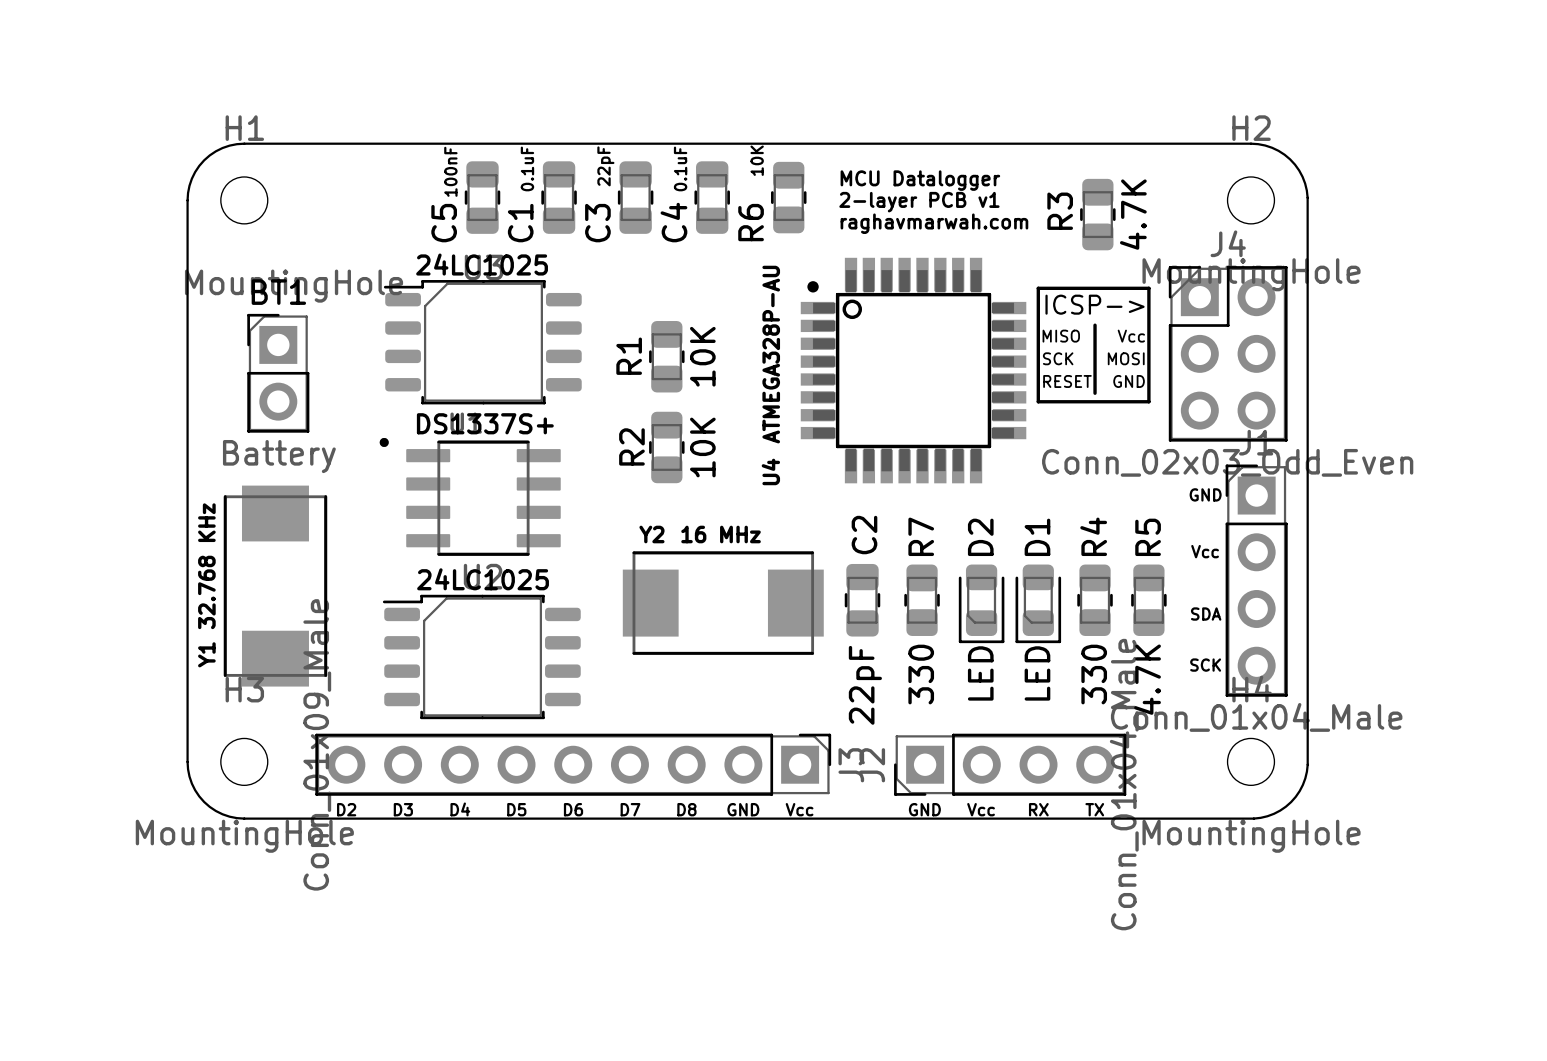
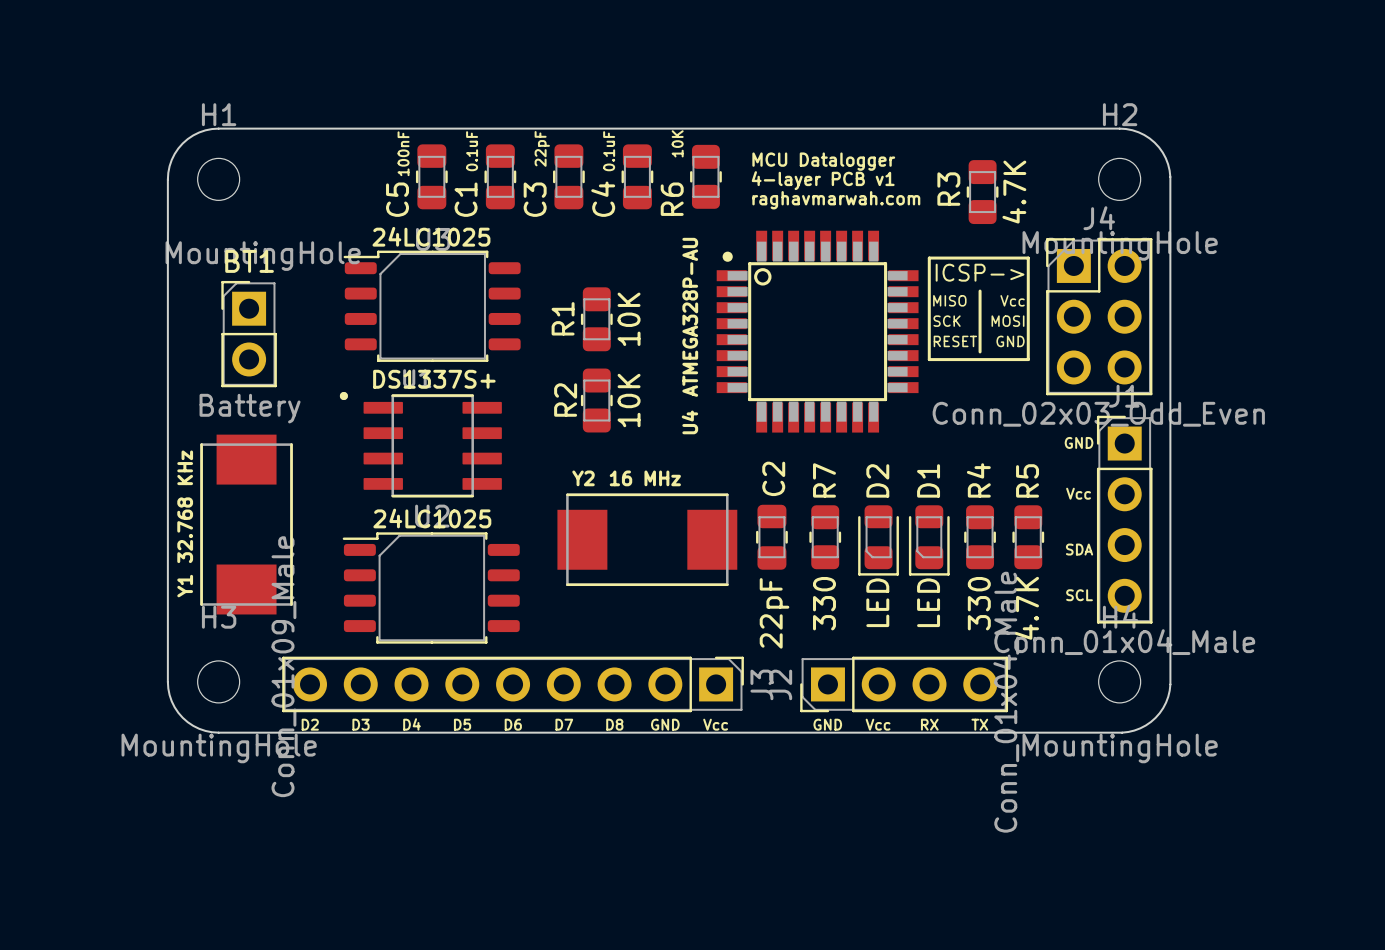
text: 2-layer PCB v1 (919, 202) -> 4-layer PCB v1 (823, 180)
text: SCK (1205, 665) -> SCL (1079, 595)

